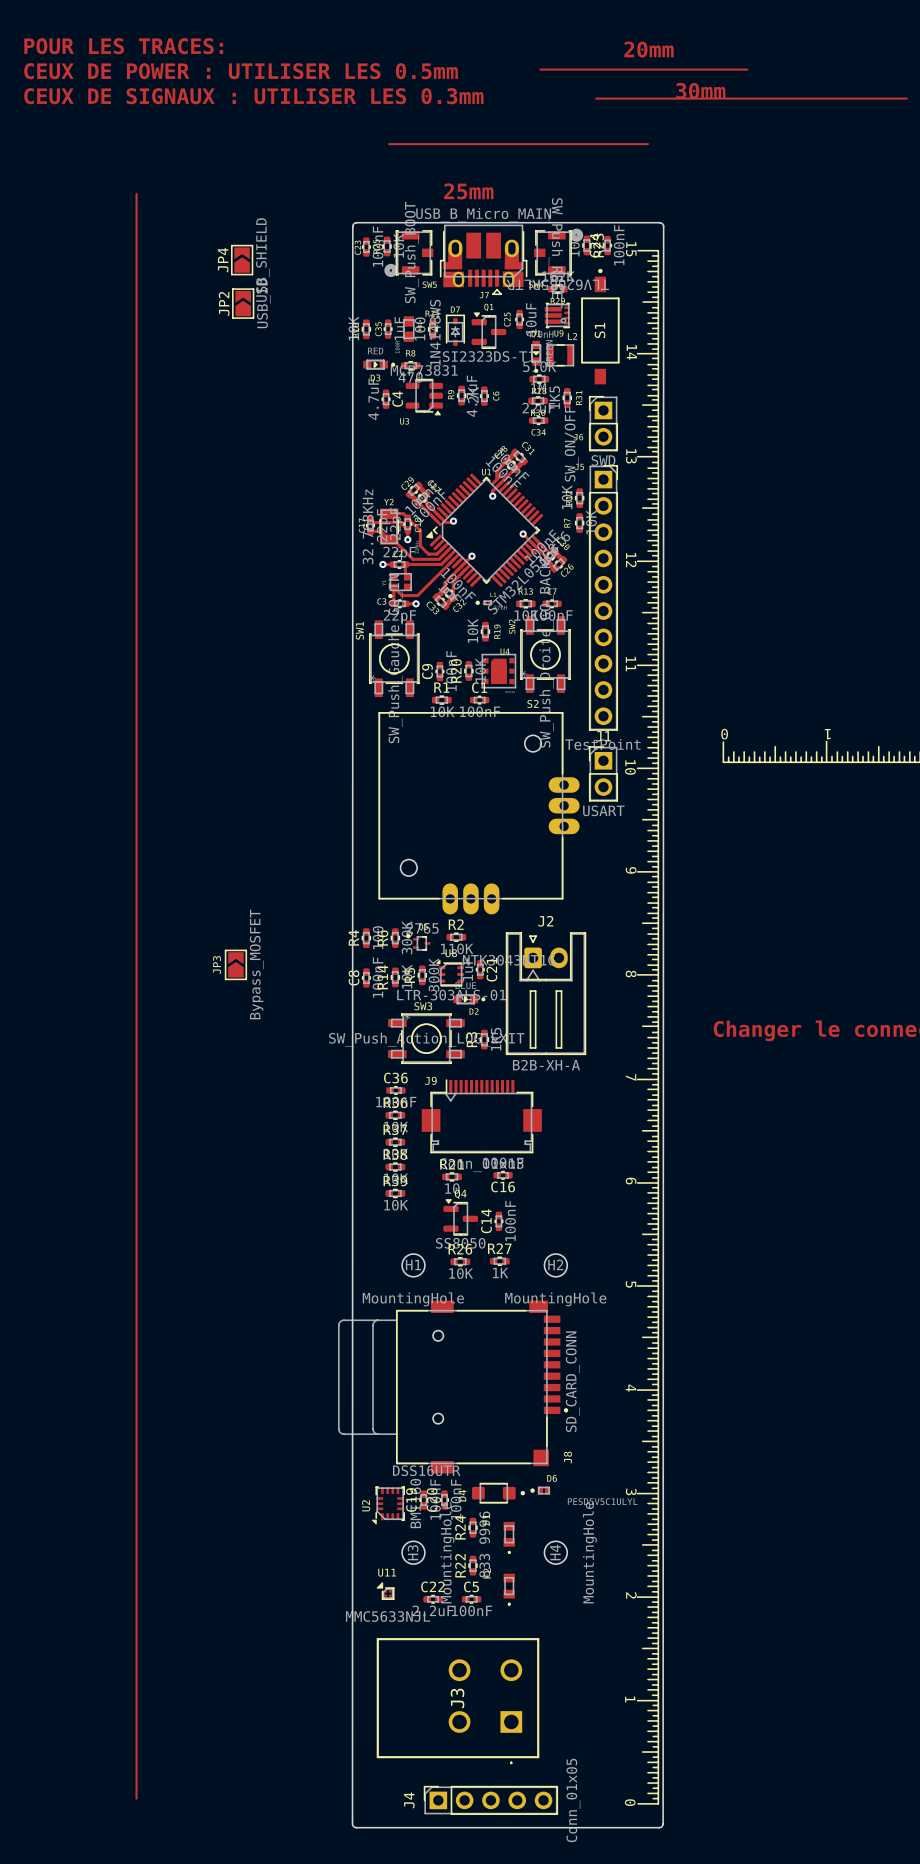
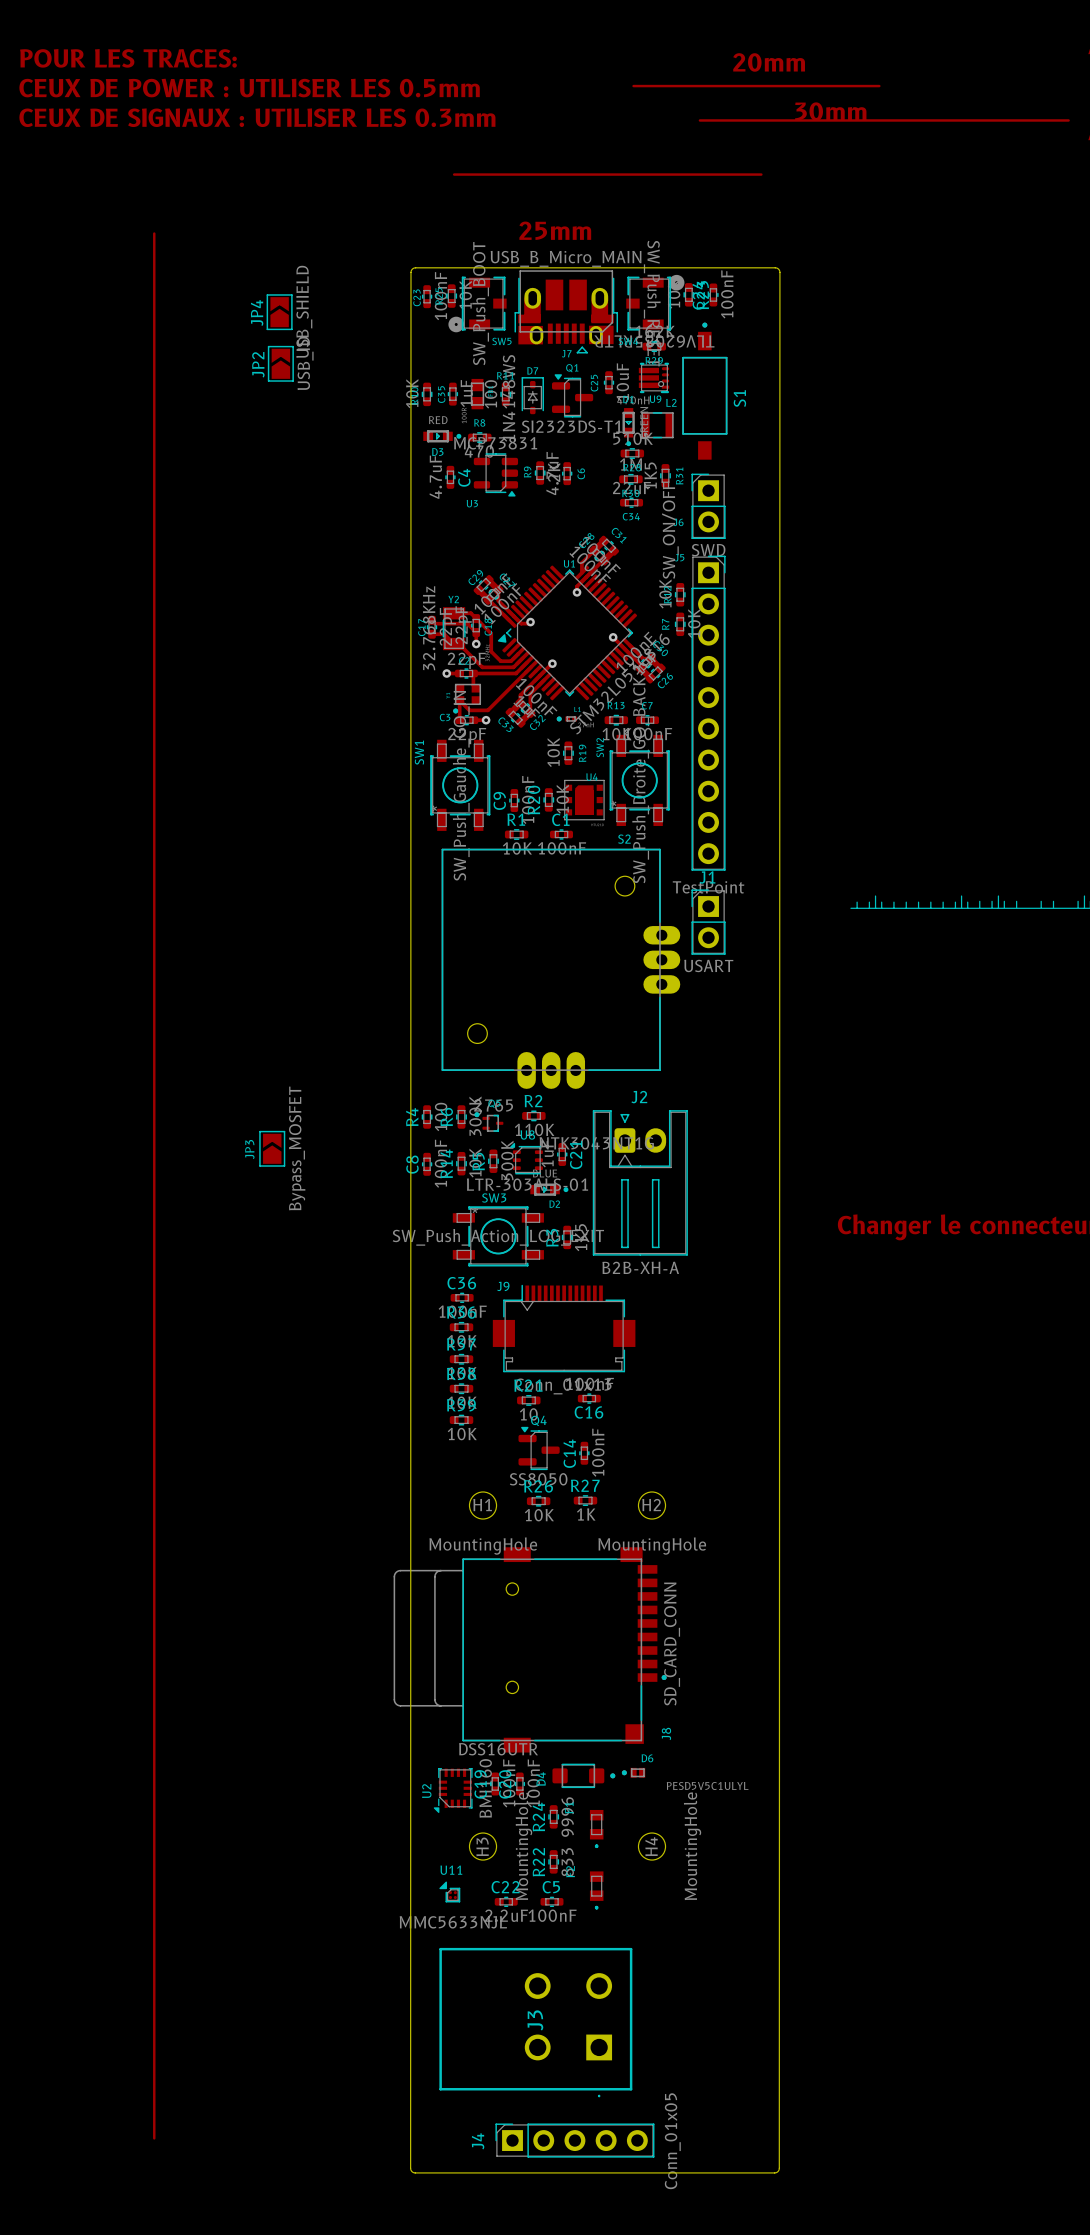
text: 15 (631, 249) -> none
line: (638, 250) (658, 250) -> none
line: (658, 250) (658, 1803) -> none
line: (652, 255) (657, 255) -> none
line: (647, 261) (658, 261) -> none
line: (652, 266) (657, 266) -> none
line: (647, 271) (658, 271) -> none
line: (652, 276) (657, 276) -> none
line: (647, 281) (658, 281) -> none
line: (652, 287) (657, 287) -> none
line: (647, 292) (658, 292) -> none
line: (652, 297) (657, 297) -> none
line: (643, 302) (658, 302) -> none
line: (652, 307) (657, 307) -> none
line: (647, 312) (658, 312) -> none
line: (652, 318) (657, 318) -> none
line: (647, 323) (658, 323) -> none
line: (652, 328) (657, 328) -> none
S1 name position: S1 (599, 330) -> S1 (739, 398)
line: (647, 333) (658, 333) -> none
line: (652, 338) (657, 338) -> none
line: (647, 343) (658, 343) -> none
line: (652, 349) (657, 349) -> none
text: 14 (631, 352) -> none
line: (637, 353) (657, 353) -> none
line: (652, 358) (657, 358) -> none
line: (647, 364) (658, 364) -> none
line: (652, 368) (657, 368) -> none
line: (647, 375) (658, 375) -> none
line: (652, 379) (657, 379) -> none
line: (647, 385) (658, 385) -> none
line: (652, 389) (657, 389) -> none
line: (647, 395) (658, 395) -> none
line: (652, 399) (657, 399) -> none
line: (642, 405) (658, 405) -> none
line: (652, 410) (657, 410) -> none
line: (647, 416) (658, 416) -> none
line: (652, 420) (657, 420) -> none
line: (647, 426) (658, 426) -> none
line: (652, 430) (657, 430) -> none
line: (647, 437) (658, 437) -> none
line: (652, 441) (657, 441) -> none
line: (647, 447) (658, 447) -> none
line: (652, 451) (657, 451) -> none
text: 13 (631, 456) -> none
line: (637, 456) (657, 456) -> none
line: (652, 462) (657, 462) -> none
line: (647, 468) (658, 468) -> none
line: (652, 472) (657, 472) -> none
line: (647, 478) (658, 478) -> none
line: (652, 483) (657, 483) -> none
line: (647, 488) (658, 488) -> none
line: (652, 493) (657, 493) -> none
line: (647, 499) (658, 499) -> none
line: (652, 503) (657, 503) -> none
line: (642, 508) (658, 508) -> none
line: (652, 514) (657, 514) -> none
line: (647, 519) (658, 519) -> none
line: (652, 524) (657, 524) -> none
line: (647, 530) (658, 530) -> none
line: (652, 534) (657, 534) -> none
line: (647, 540) (658, 540) -> none
line: (652, 545) (657, 545) -> none
line: (647, 551) (658, 551) -> none
line: (652, 555) (657, 555) -> none
text: 12 (631, 560) -> none
line: (637, 561) (657, 561) -> none
line: (652, 566) (657, 566) -> none
line: (647, 571) (658, 571) -> none
line: (652, 576) (657, 576) -> none
line: (647, 582) (658, 582) -> none
line: (652, 587) (657, 587) -> none
line: (647, 592) (658, 592) -> none
line: (652, 597) (657, 597) -> none
line: (647, 602) (658, 602) -> none
line: (652, 607) (657, 607) -> none
line: (642, 612) (658, 612) -> none
line: (652, 618) (657, 618) -> none
line: (647, 623) (658, 623) -> none
line: (652, 628) (657, 628) -> none
line: (647, 633) (658, 633) -> none
line: (652, 639) (657, 639) -> none
line: (647, 644) (658, 644) -> none
line: (652, 649) (657, 649) -> none
line: (647, 654) (658, 654) -> none
line: (652, 659) (657, 659) -> none
text: 11 (630, 664) -> none
line: (637, 665) (657, 665) -> none
line: (652, 670) (657, 670) -> none
line: (647, 675) (658, 675) -> none
line: (652, 680) (657, 680) -> none
line: (647, 685) (658, 685) -> none
line: (652, 690) (657, 690) -> none
line: (647, 695) (658, 695) -> none
line: (652, 701) (657, 701) -> none
line: (647, 706) (658, 706) -> none
line: (652, 711) (657, 711) -> none
line: (642, 716) (658, 716) -> none
line: (652, 721) (657, 721) -> none
line: (647, 727) (658, 727) -> none
line: (652, 732) (657, 732) -> none
text: 0 (724, 734) -> none
text: 1 (827, 734) -> none
line: (647, 737) (658, 737) -> none
line: (826, 741) (826, 761) -> none
line: (652, 742) (657, 742) -> none
line: (723, 742) (723, 762) -> none
line: (775, 746) (775, 762) -> none
line: (878, 746) (878, 762) -> none
line: (647, 747) (658, 747) -> none
line: (733, 751) (733, 762) -> none
line: (754, 751) (754, 762) -> none
line: (764, 751) (764, 762) -> none
line: (785, 751) (785, 762) -> none
line: (795, 751) (795, 762) -> none
line: (806, 751) (806, 762) -> none
line: (837, 751) (837, 762) -> none
line: (858, 751) (858, 762) -> none
line: (868, 751) (868, 762) -> none
line: (889, 751) (889, 762) -> none
line: (899, 751) (899, 762) -> none
line: (909, 751) (909, 762) -> none
line: (652, 752) (657, 752) -> none
line: (873, 756) (873, 761) -> none
line: (904, 756) (904, 761) -> none
line: (647, 758) (658, 758) -> none
line: (652, 763) (657, 763) -> none
text: 10 (630, 767) -> none
line: (637, 768) (657, 768) -> none
line: (652, 773) (657, 773) -> none
line: (647, 778) (658, 778) -> none
line: (652, 783) (657, 783) -> none
line: (647, 789) (658, 789) -> none
line: (652, 794) (657, 794) -> none
line: (647, 799) (658, 799) -> none
line: (652, 804) (657, 804) -> none
line: (647, 809) (658, 809) -> none
line: (652, 815) (657, 815) -> none
line: (642, 819) (658, 819) -> none
line: (652, 825) (657, 825) -> none
line: (647, 830) (658, 830) -> none
line: (652, 835) (657, 835) -> none
line: (647, 840) (658, 840) -> none
line: (652, 846) (657, 846) -> none
line: (647, 851) (658, 851) -> none
line: (652, 856) (657, 856) -> none
line: (647, 861) (658, 861) -> none
line: (652, 866) (657, 866) -> none
text: 9 (631, 870) -> none
line: (637, 871) (657, 871) -> none
line: (652, 876) (657, 876) -> none
line: (647, 882) (658, 882) -> none
line: (652, 886) (657, 886) -> none
line: (647, 892) (658, 892) -> none
line: (652, 897) (657, 897) -> none
line: (647, 903) (658, 903) -> none
line: (652, 907) (657, 907) -> none
line: (647, 913) (658, 913) -> none
line: (652, 918) (657, 918) -> none
line: (642, 923) (658, 923) -> none
line: (652, 928) (657, 928) -> none
line: (647, 934) (658, 934) -> none
line: (652, 938) (657, 938) -> none
line: (647, 944) (658, 944) -> none
line: (652, 949) (657, 949) -> none
line: (647, 954) (658, 954) -> none
line: (652, 959) (657, 959) -> none
line: (647, 965) (658, 965) -> none
line: (652, 969) (657, 969) -> none
text: 8 (631, 973) -> none
line: (637, 974) (657, 974) -> none
line: (652, 980) (657, 980) -> none
line: (647, 985) (658, 985) -> none
line: (652, 991) (657, 991) -> none
line: (647, 996) (658, 996) -> none
line: (652, 1001) (657, 1001) -> none
line: (647, 1006) (658, 1006) -> none
line: (652, 1011) (657, 1011) -> none
line: (647, 1016) (658, 1016) -> none
line: (652, 1022) (657, 1022) -> none
line: (642, 1026) (658, 1026) -> none
line: (652, 1032) (657, 1032) -> none
line: (647, 1037) (658, 1037) -> none
line: (652, 1042) (657, 1042) -> none
line: (647, 1047) (658, 1047) -> none
line: (652, 1053) (657, 1053) -> none
line: (647, 1058) (658, 1058) -> none
line: (652, 1063) (657, 1063) -> none
line: (647, 1068) (658, 1068) -> none
line: (652, 1073) (657, 1073) -> none
text: 7 (631, 1077) -> none
line: (637, 1079) (657, 1079) -> none
line: (652, 1084) (657, 1084) -> none
line: (647, 1089) (658, 1089) -> none
line: (652, 1095) (657, 1095) -> none
line: (647, 1099) (658, 1099) -> none
line: (652, 1105) (657, 1105) -> none
line: (647, 1110) (658, 1110) -> none
line: (652, 1115) (657, 1115) -> none
line: (647, 1120) (658, 1120) -> none
line: (652, 1126) (657, 1126) -> none
line: (642, 1130) (658, 1130) -> none
line: (652, 1136) (657, 1136) -> none
line: (647, 1141) (658, 1141) -> none
line: (652, 1146) (657, 1146) -> none
line: (647, 1151) (658, 1151) -> none
line: (652, 1157) (657, 1157) -> none
line: (647, 1161) (658, 1161) -> none
line: (652, 1167) (657, 1167) -> none
line: (647, 1172) (658, 1172) -> none
line: (652, 1177) (657, 1177) -> none
text: 6 (631, 1181) -> none
line: (637, 1182) (657, 1182) -> none
line: (652, 1187) (657, 1187) -> none
line: (647, 1192) (658, 1192) -> none
line: (652, 1198) (657, 1198) -> none
line: (647, 1203) (658, 1203) -> none
line: (652, 1208) (657, 1208) -> none
line: (647, 1213) (658, 1213) -> none
line: (652, 1218) (657, 1218) -> none
line: (647, 1223) (658, 1223) -> none
line: (652, 1229) (657, 1229) -> none
line: (642, 1234) (658, 1234) -> none
line: (652, 1239) (657, 1239) -> none
line: (647, 1244) (658, 1244) -> none
line: (652, 1249) (657, 1249) -> none
line: (647, 1255) (658, 1255) -> none
line: (652, 1260) (657, 1260) -> none
line: (647, 1265) (658, 1265) -> none
line: (652, 1270) (657, 1270) -> none
line: (647, 1275) (658, 1275) -> none
line: (652, 1280) (657, 1280) -> none
text: 5 (630, 1284) -> none
line: (637, 1286) (657, 1286) -> none
line: (652, 1291) (657, 1291) -> none
line: (647, 1296) (658, 1296) -> none
line: (652, 1301) (657, 1301) -> none
line: (647, 1306) (658, 1306) -> none
line: (652, 1311) (657, 1311) -> none
line: (647, 1317) (658, 1317) -> none
line: (652, 1322) (657, 1322) -> none
line: (647, 1327) (658, 1327) -> none
line: (652, 1332) (657, 1332) -> none
line: (642, 1337) (658, 1337) -> none
line: (652, 1343) (657, 1343) -> none
line: (647, 1348) (658, 1348) -> none
line: (652, 1353) (657, 1353) -> none
line: (647, 1358) (658, 1358) -> none
line: (652, 1363) (657, 1363) -> none
line: (647, 1368) (658, 1368) -> none
line: (652, 1374) (657, 1374) -> none
line: (647, 1379) (658, 1379) -> none
line: (652, 1384) (657, 1384) -> none
text: 4 (631, 1388) -> none
line: (637, 1390) (657, 1390) -> none
line: (652, 1395) (657, 1395) -> none
line: (647, 1399) (658, 1399) -> none
line: (652, 1405) (657, 1405) -> none
line: (647, 1410) (658, 1410) -> none
line: (652, 1415) (657, 1415) -> none
line: (647, 1420) (658, 1420) -> none
line: (652, 1426) (657, 1426) -> none
line: (647, 1431) (658, 1431) -> none
line: (652, 1436) (657, 1436) -> none
line: (642, 1441) (658, 1441) -> none
line: (652, 1446) (657, 1446) -> none
line: (647, 1451) (658, 1451) -> none
line: (652, 1457) (657, 1457) -> none
line: (647, 1462) (658, 1462) -> none
line: (652, 1467) (657, 1467) -> none
line: (647, 1472) (658, 1472) -> none
line: (652, 1477) (657, 1477) -> none
line: (647, 1482) (658, 1482) -> none
line: (652, 1488) (657, 1488) -> none
text: 3 (631, 1491) -> none
line: (637, 1493) (657, 1493) -> none
line: (652, 1498) (657, 1498) -> none
line: (647, 1503) (658, 1503) -> none
line: (652, 1509) (657, 1509) -> none
line: (647, 1513) (658, 1513) -> none
line: (652, 1519) (657, 1519) -> none
line: (647, 1524) (658, 1524) -> none
line: (652, 1529) (657, 1529) -> none
line: (647, 1534) (658, 1534) -> none
line: (652, 1540) (657, 1540) -> none
line: (642, 1544) (658, 1544) -> none
line: (652, 1550) (657, 1550) -> none
line: (647, 1555) (658, 1555) -> none
line: (652, 1560) (657, 1560) -> none
line: (647, 1565) (658, 1565) -> none
line: (652, 1571) (657, 1571) -> none
line: (647, 1576) (658, 1576) -> none
line: (652, 1581) (657, 1581) -> none
line: (647, 1586) (658, 1586) -> none
line: (652, 1591) (657, 1591) -> none
text: 2 (631, 1595) -> none
line: (637, 1597) (657, 1597) -> none
line: (652, 1602) (657, 1602) -> none
line: (647, 1607) (658, 1607) -> none
line: (652, 1612) (657, 1612) -> none
line: (647, 1617) (658, 1617) -> none
line: (652, 1622) (657, 1622) -> none
line: (647, 1627) (658, 1627) -> none
line: (652, 1633) (657, 1633) -> none
line: (647, 1638) (658, 1638) -> none
line: (652, 1643) (657, 1643) -> none
line: (642, 1648) (658, 1648) -> none
line: (652, 1653) (657, 1653) -> none
line: (647, 1658) (658, 1658) -> none
line: (652, 1664) (657, 1664) -> none
line: (647, 1669) (658, 1669) -> none
line: (652, 1674) (657, 1674) -> none
line: (647, 1679) (658, 1679) -> none
line: (652, 1684) (657, 1684) -> none
line: (647, 1689) (658, 1689) -> none
line: (652, 1695) (657, 1695) -> none
text: 1 (630, 1699) -> none
line: (637, 1700) (657, 1700) -> none
line: (653, 1705) (658, 1705) -> none
line: (647, 1710) (658, 1710) -> none
line: (653, 1715) (658, 1715) -> none
line: (647, 1720) (658, 1720) -> none
line: (653, 1726) (658, 1726) -> none
line: (647, 1731) (658, 1731) -> none
line: (653, 1736) (658, 1736) -> none
line: (647, 1741) (658, 1741) -> none
line: (653, 1746) (658, 1746) -> none
line: (642, 1752) (658, 1752) -> none
line: (653, 1757) (658, 1757) -> none
line: (647, 1762) (658, 1762) -> none
line: (653, 1767) (658, 1767) -> none
line: (647, 1772) (658, 1772) -> none
line: (653, 1777) (658, 1777) -> none
line: (647, 1783) (658, 1783) -> none
line: (653, 1788) (658, 1788) -> none
line: (647, 1793) (658, 1793) -> none
line: (653, 1798) (658, 1798) -> none
text: 0 (630, 1802) -> none
line: (638, 1803) (658, 1803) -> none

